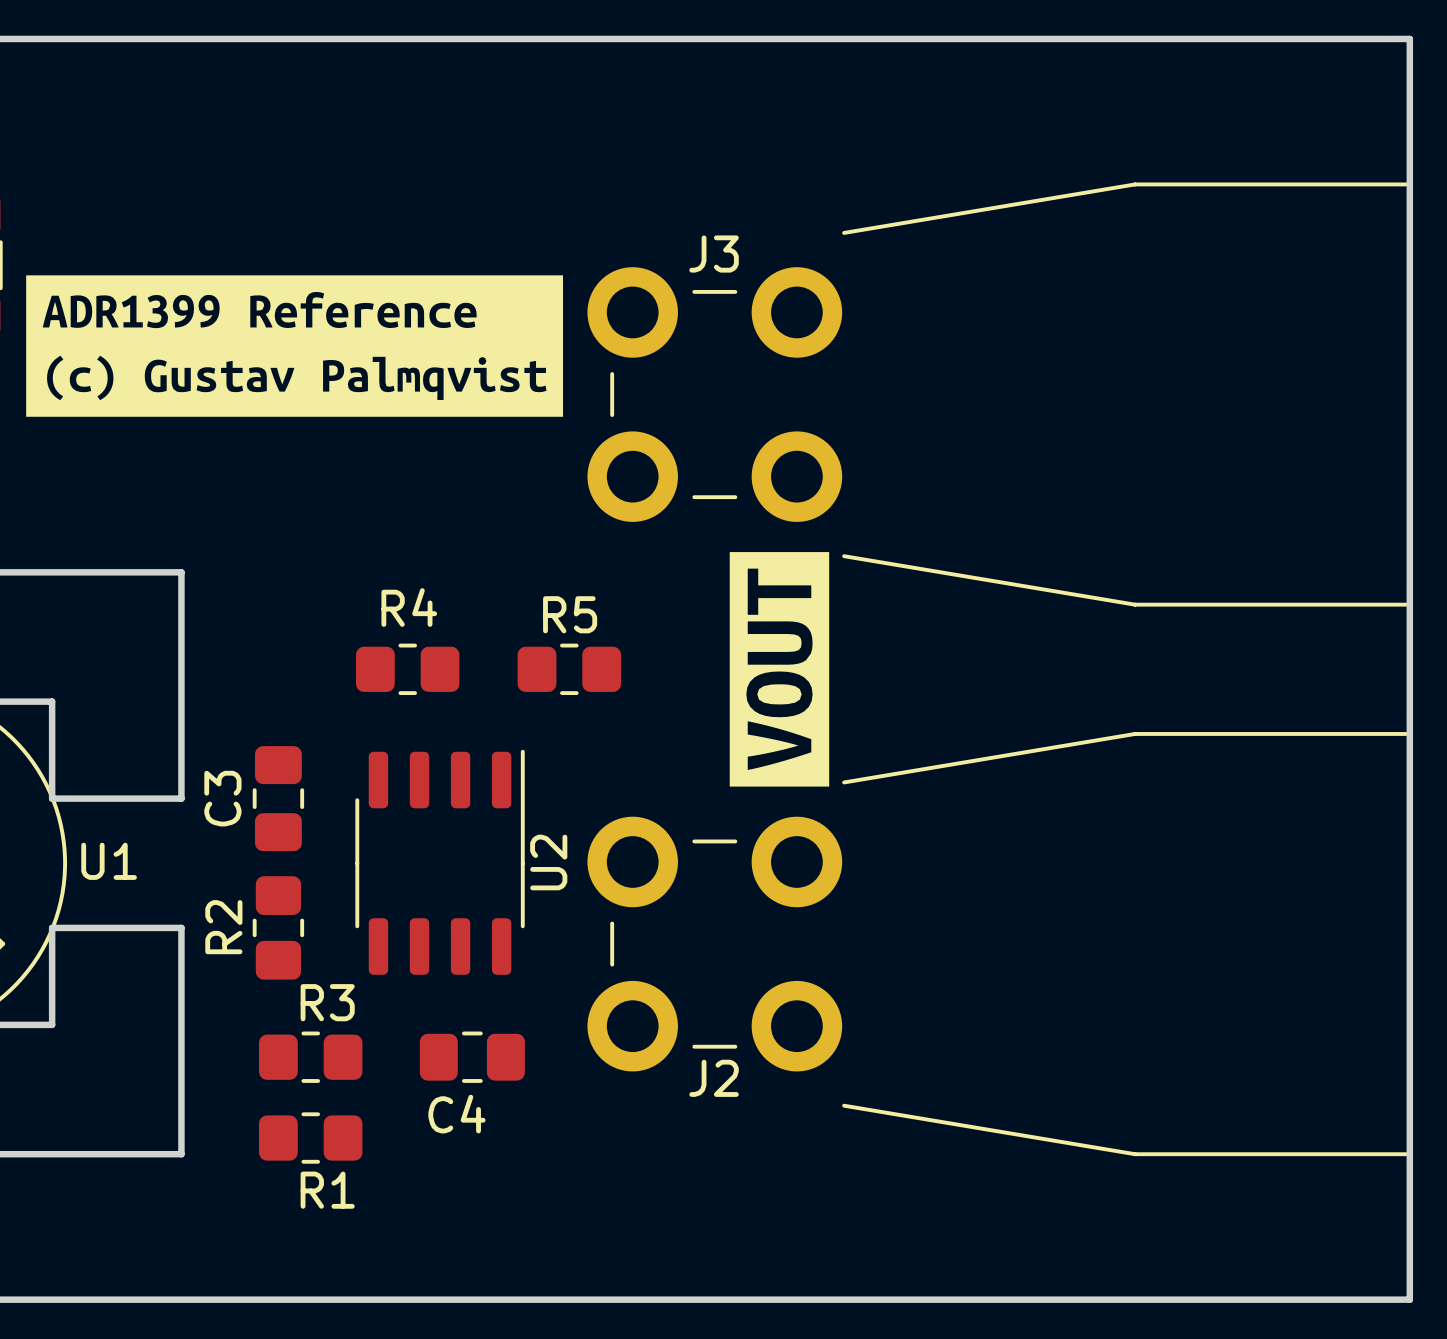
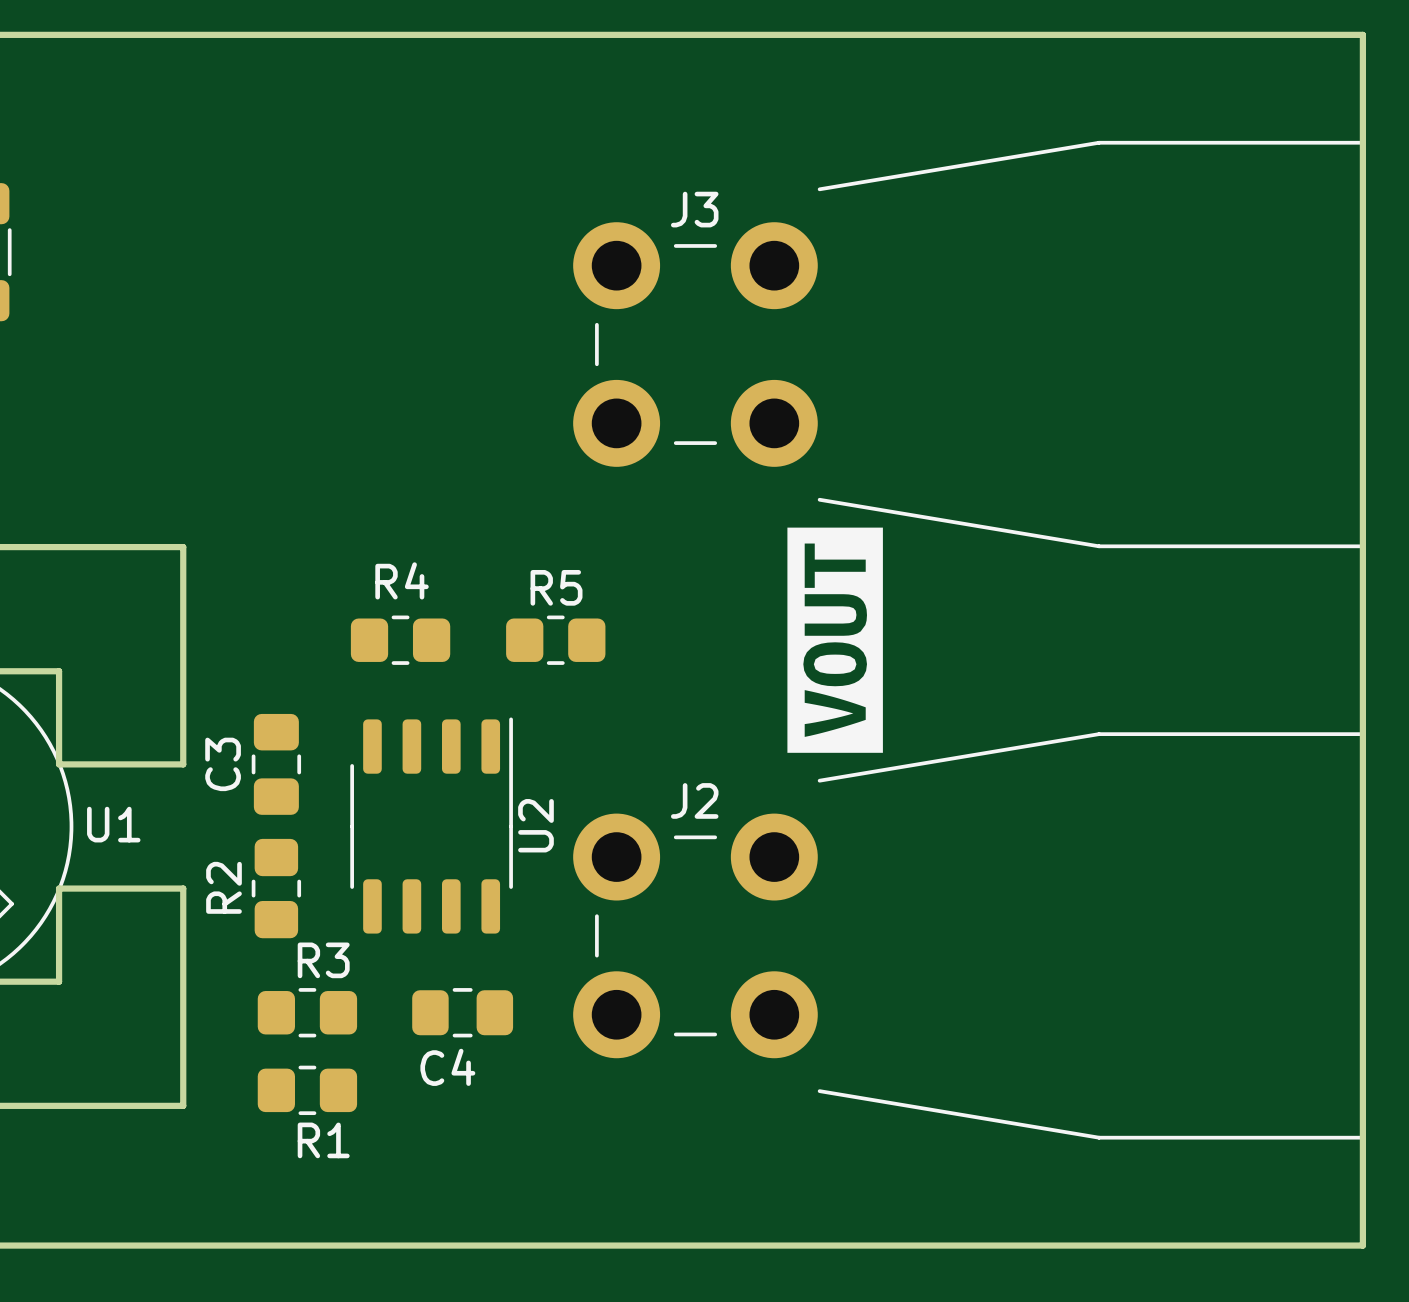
drawing: [26, 275, 564, 417] -> none
J3 position: (997, 394) -> (967, 344)
drawing position: (779, 669) -> (835, 640)
J2 position: (997, 944) -> (967, 935)
J2 name position: J2 (714, 1078) -> J2 (694, 800)

